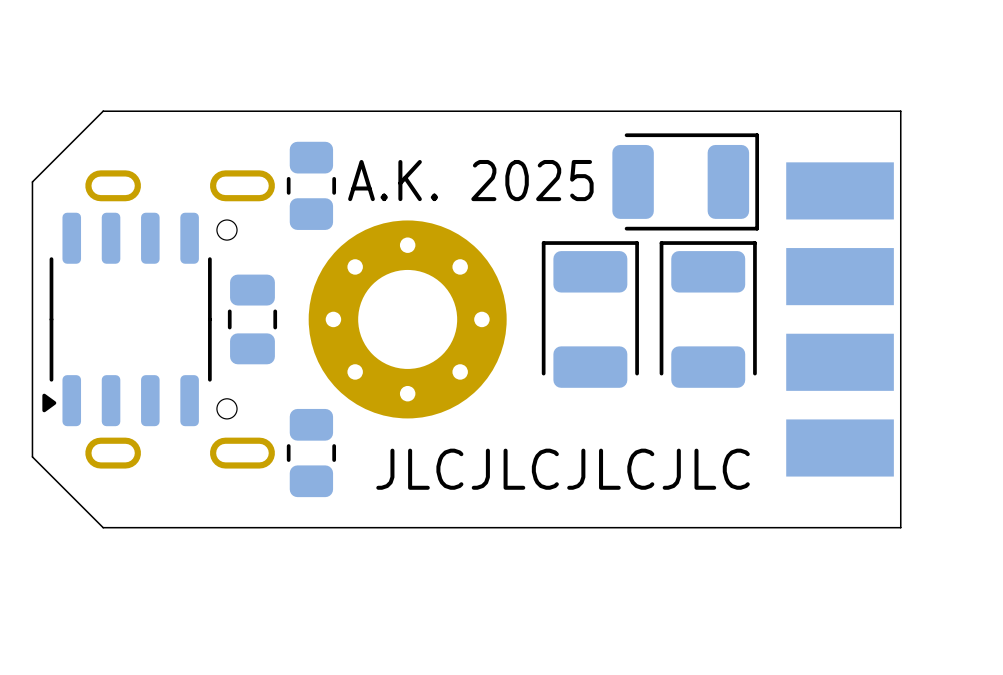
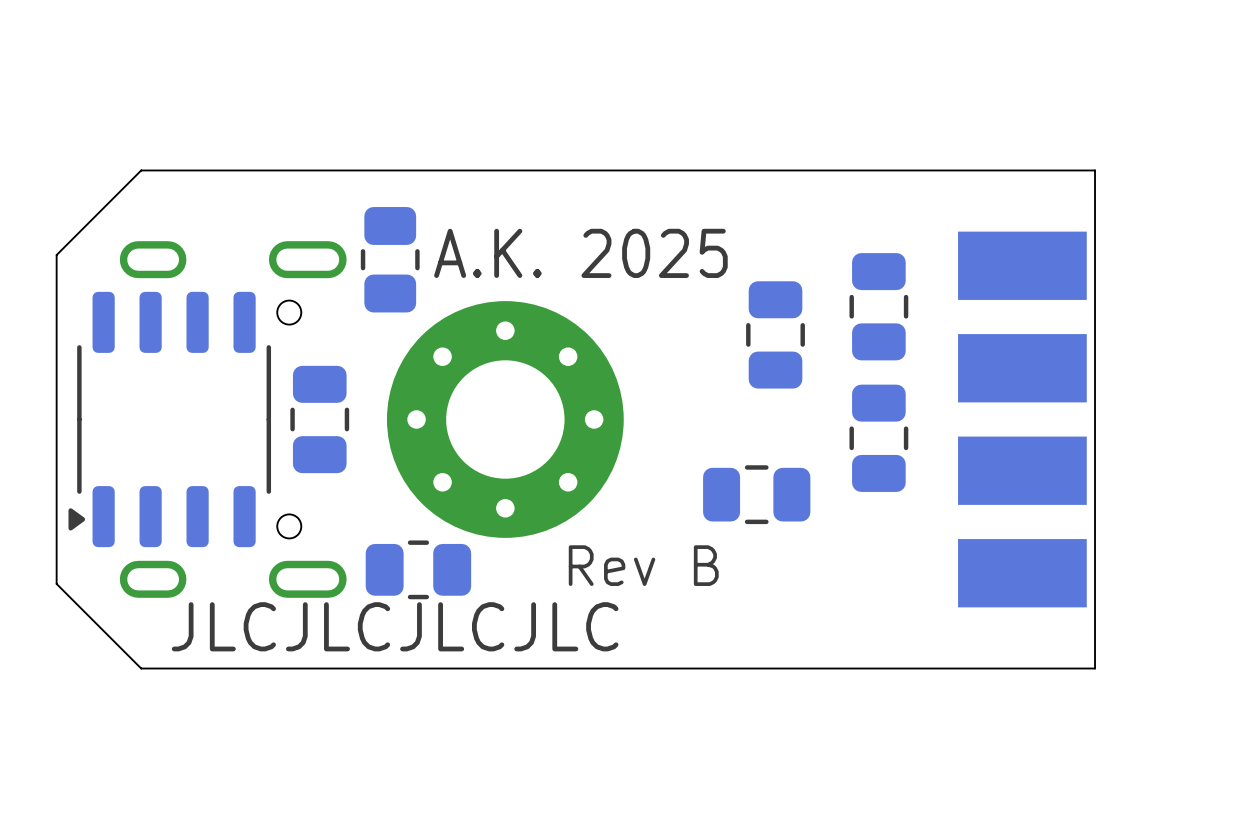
part: (685, 181) -> none
part: none -> (878, 306)
part footprint: [659, 241, 757, 388] -> [849, 384, 909, 492]
part: none -> (775, 334)
part: (590, 314) -> none
part: none -> (756, 494)
text: none -> Rev B (643, 565)
part rotation: 0° (311, 453) -> 90° clockwise (418, 569)
text position: JLCJLCJLCJLC (563, 469) -> JLCJLCJLCJLC (395, 626)

